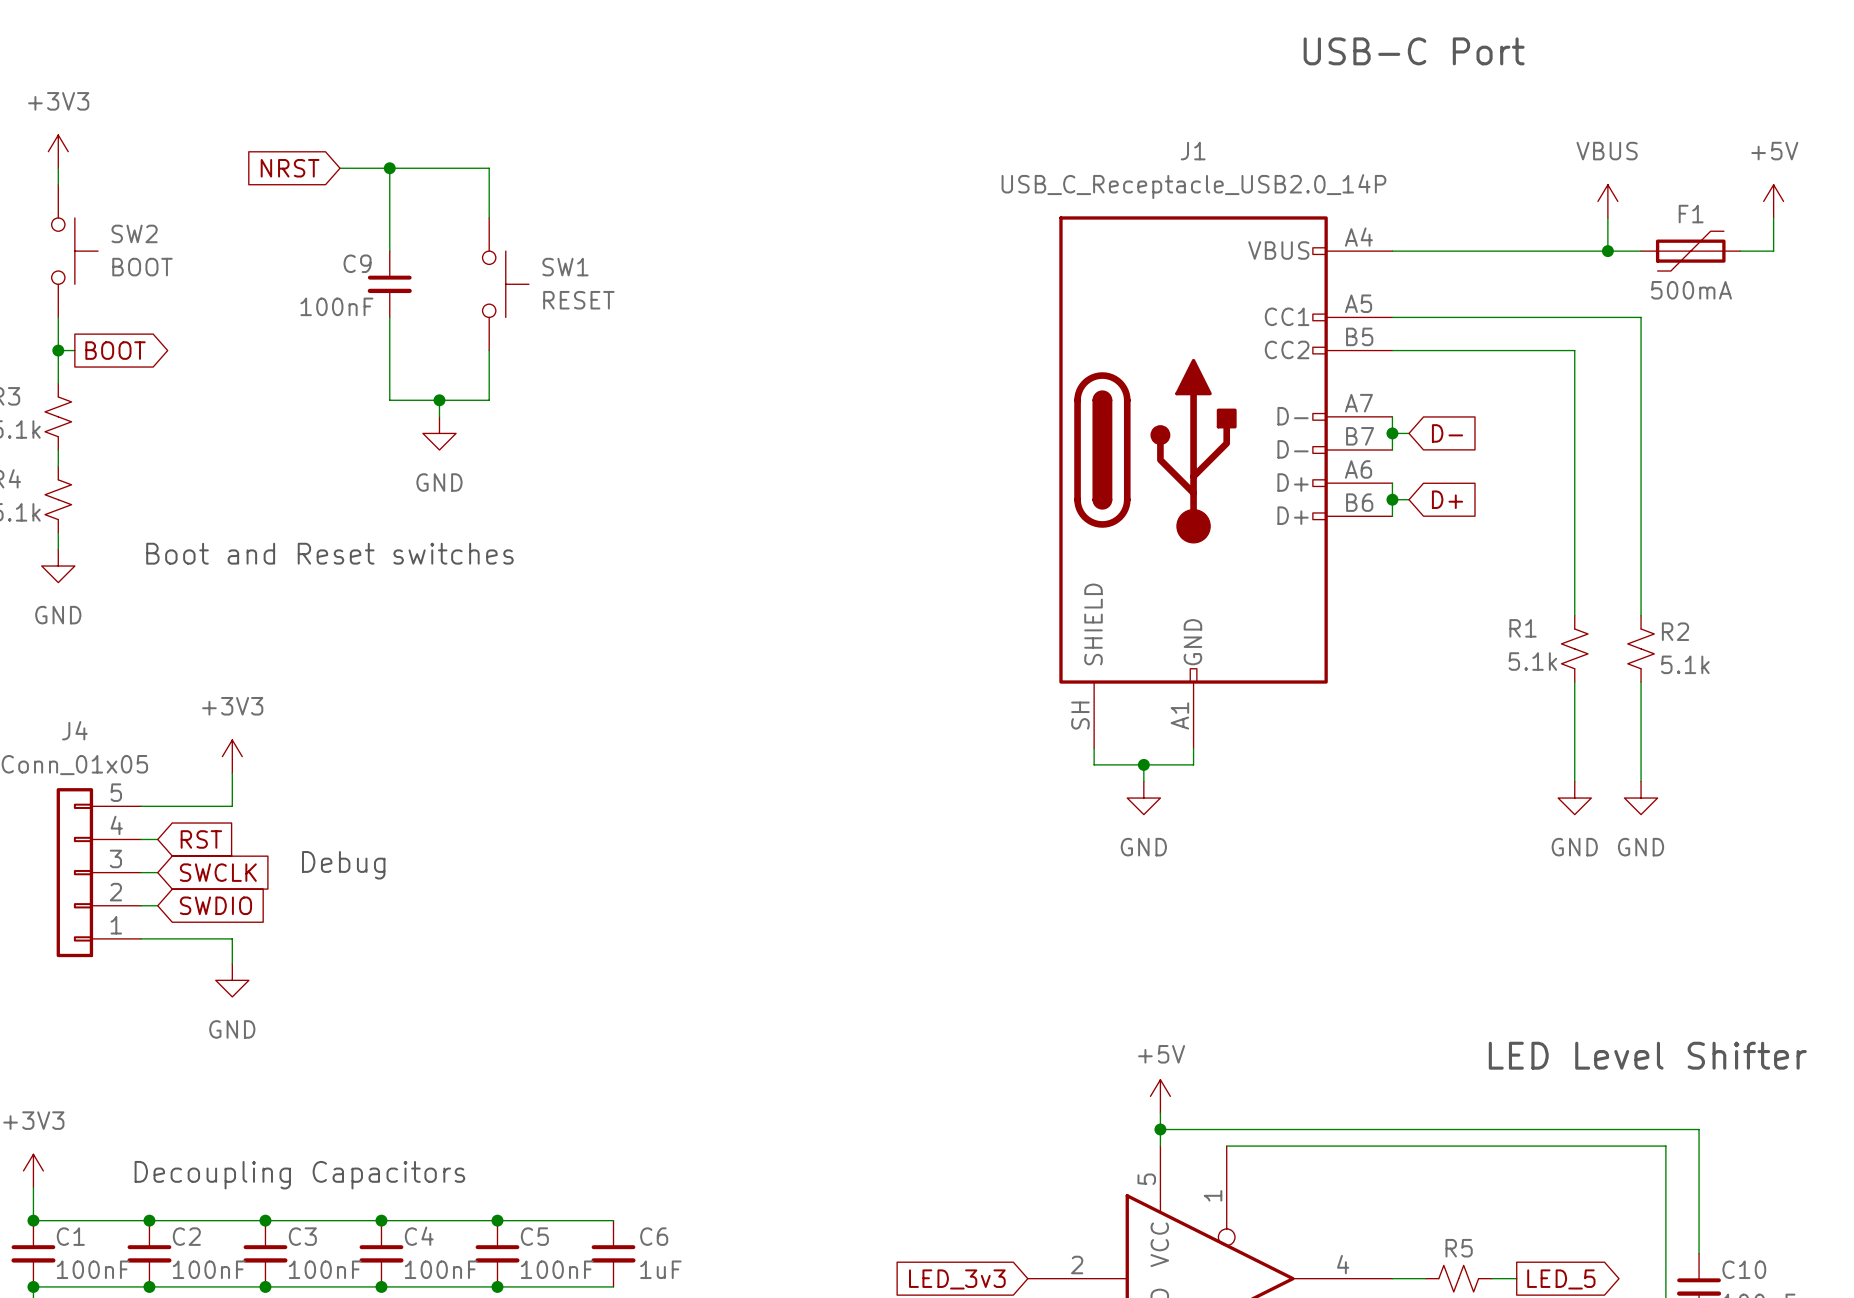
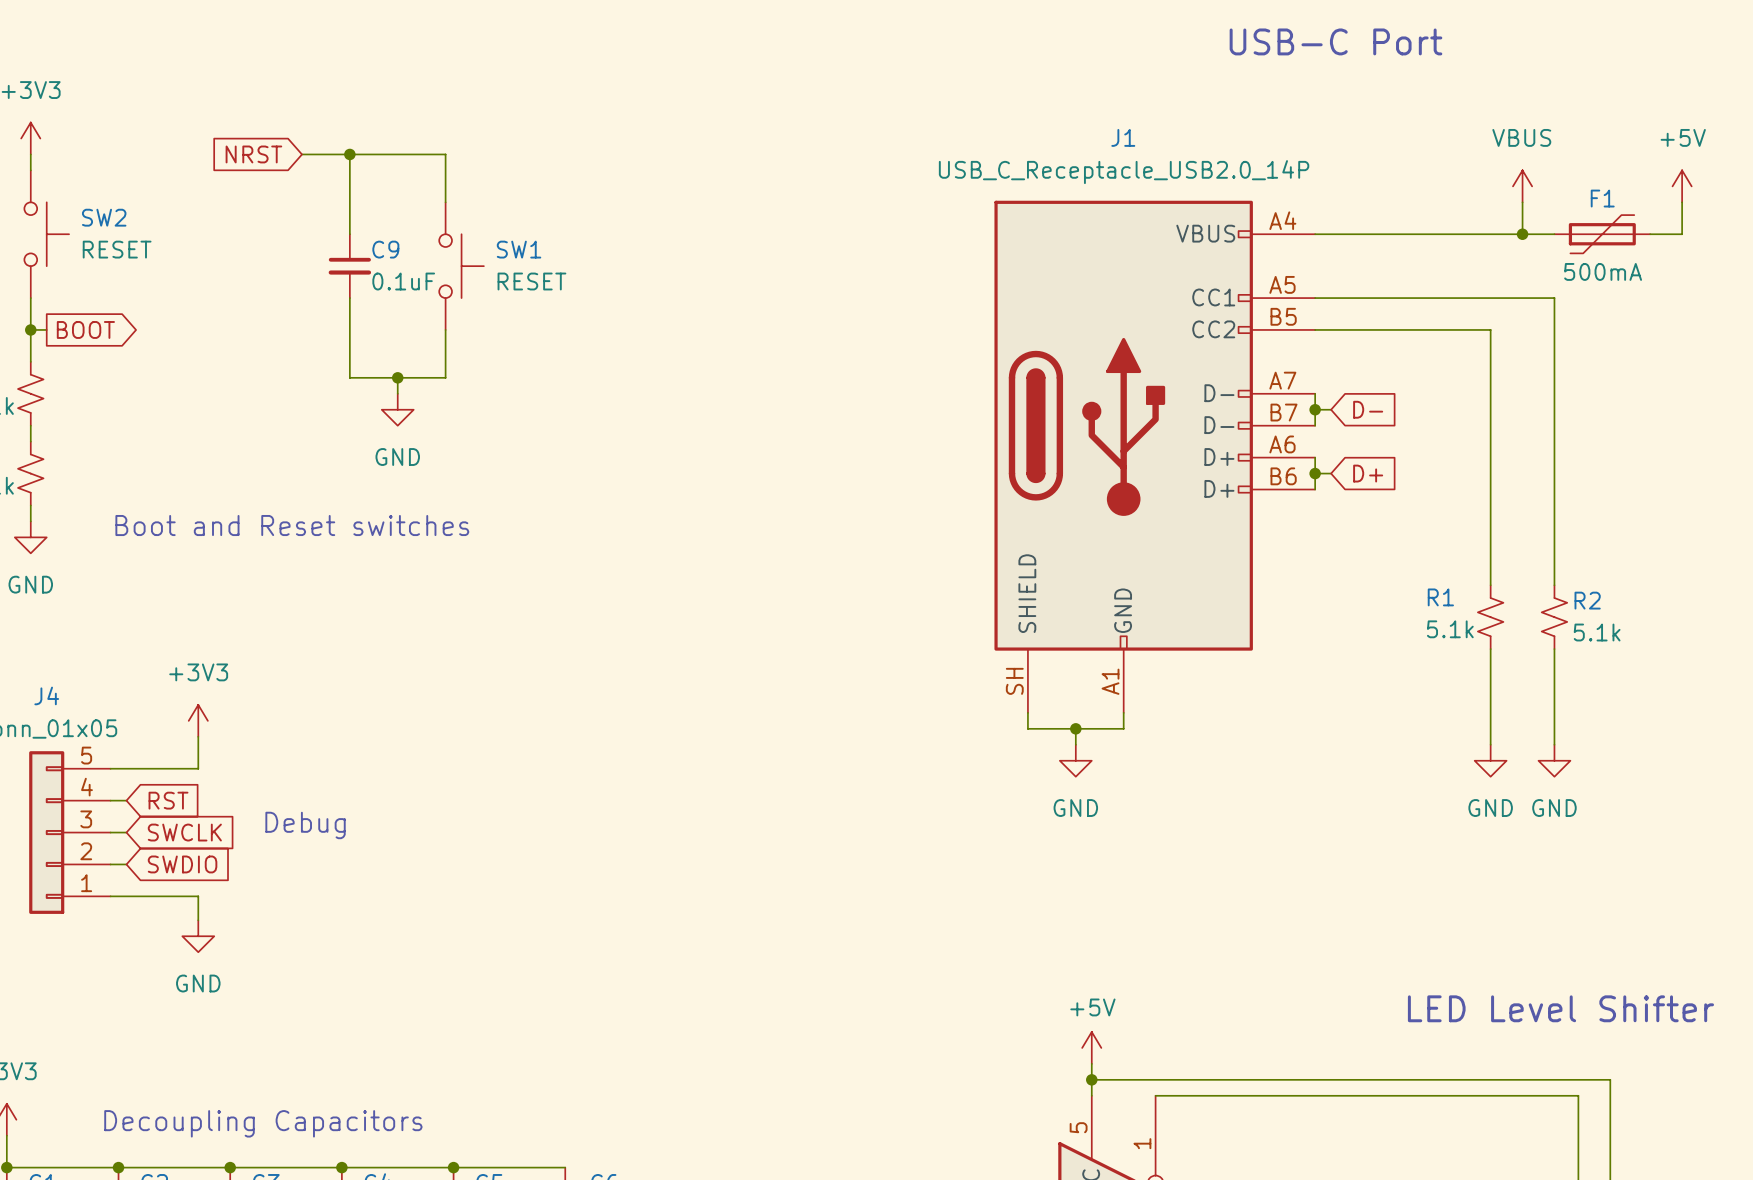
C9 name position: C9 (357, 263) -> C9 (385, 249)
SW2 value: BOOT (142, 267) -> RESET (117, 249)
C9 value: 100nF (336, 306) -> 0.1uF (403, 281)

